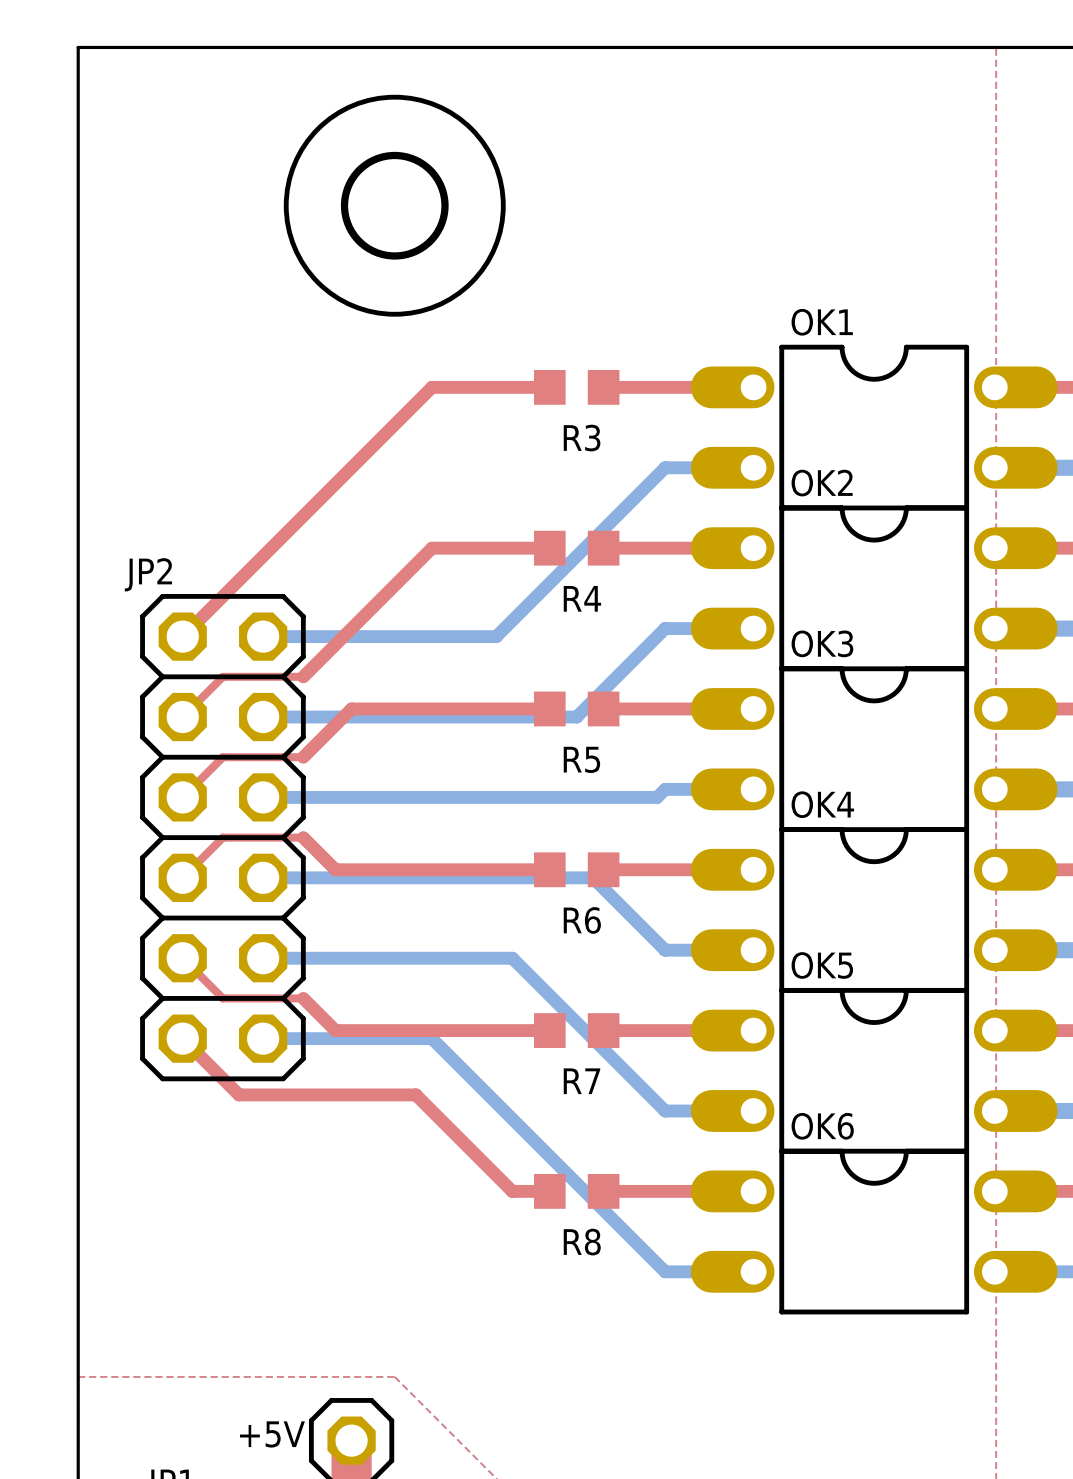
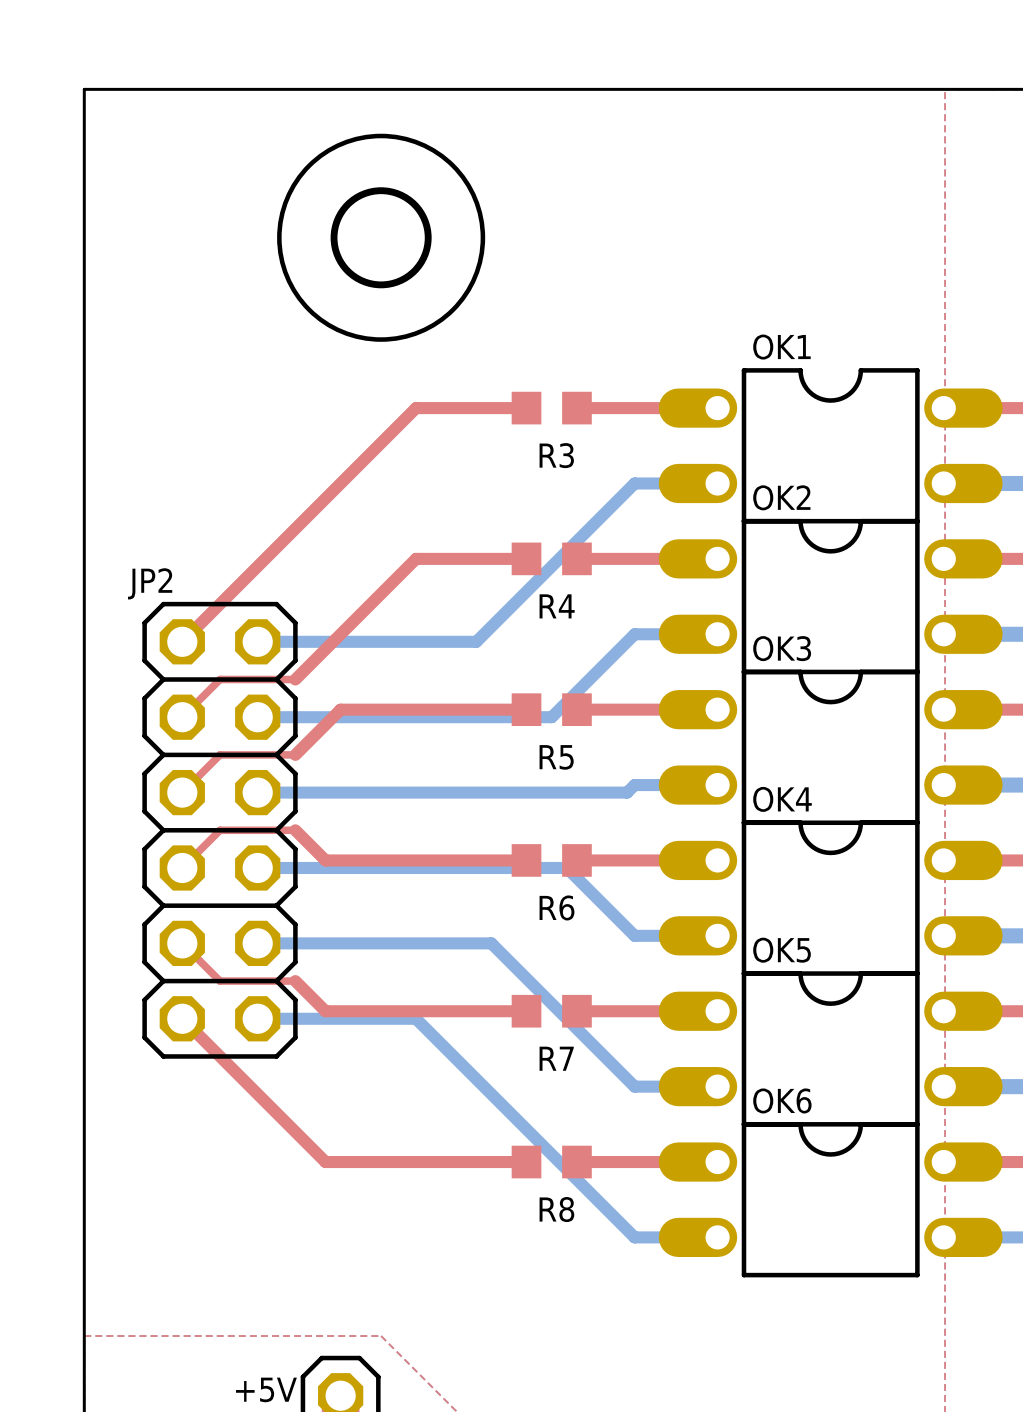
top track: (239, 1094) (415, 1094) (512, 1191) -> (235, 1071) (325, 1162) (491, 1162)

